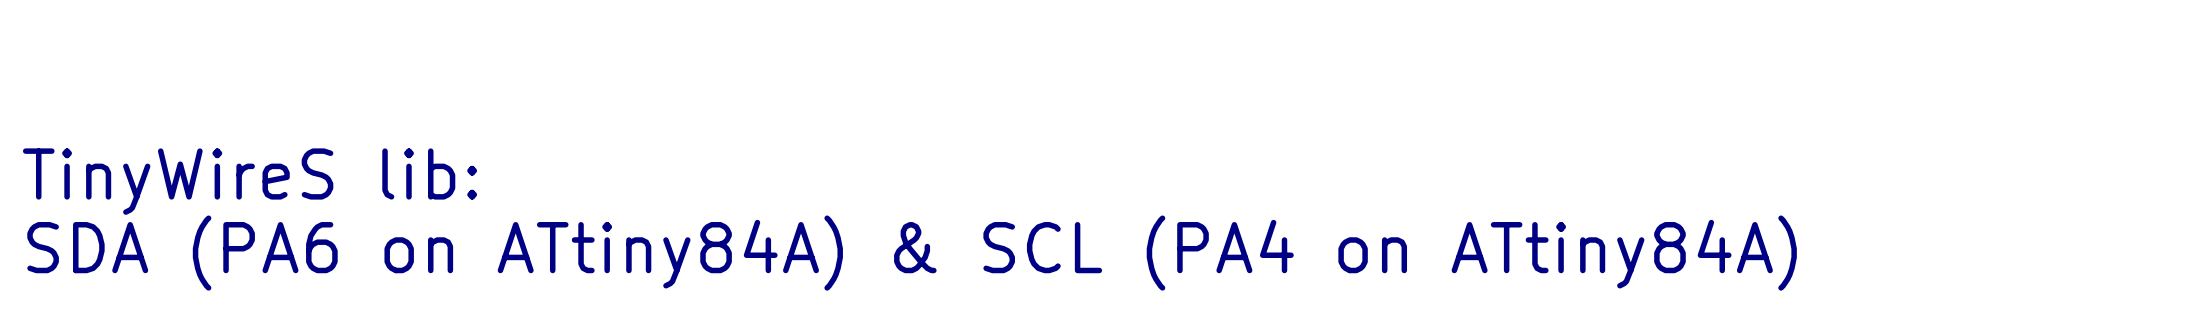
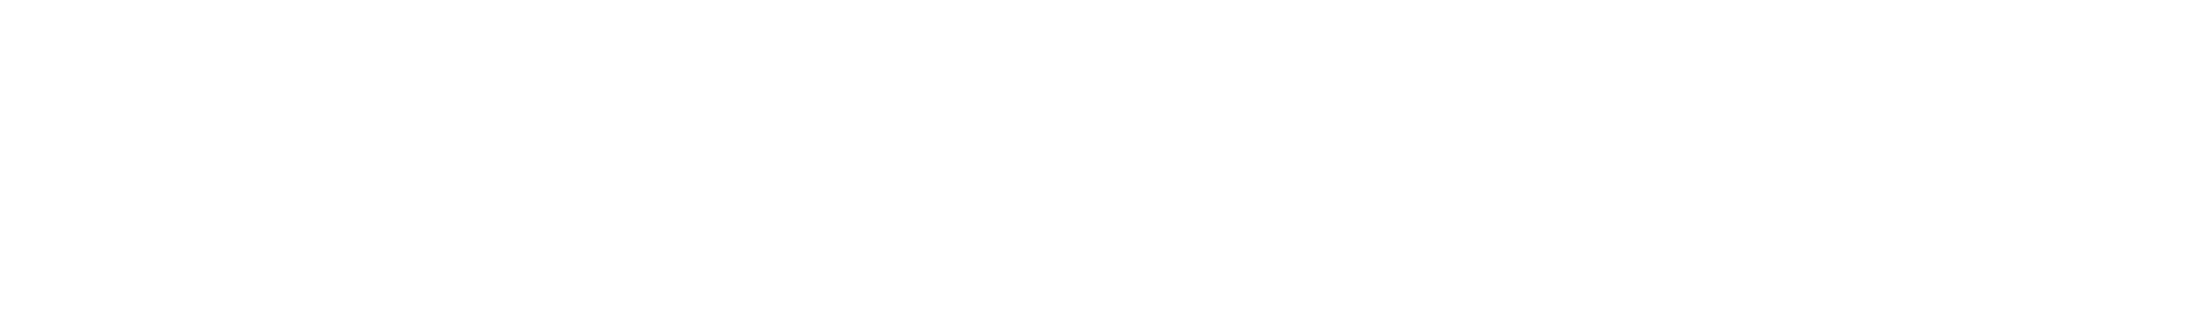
text: TinyWireS lib: (250, 181) -> none
text: SDA (PA6 on ATtiny84A) & SCL (PA4 on ATtiny84A) (912, 253) -> none

